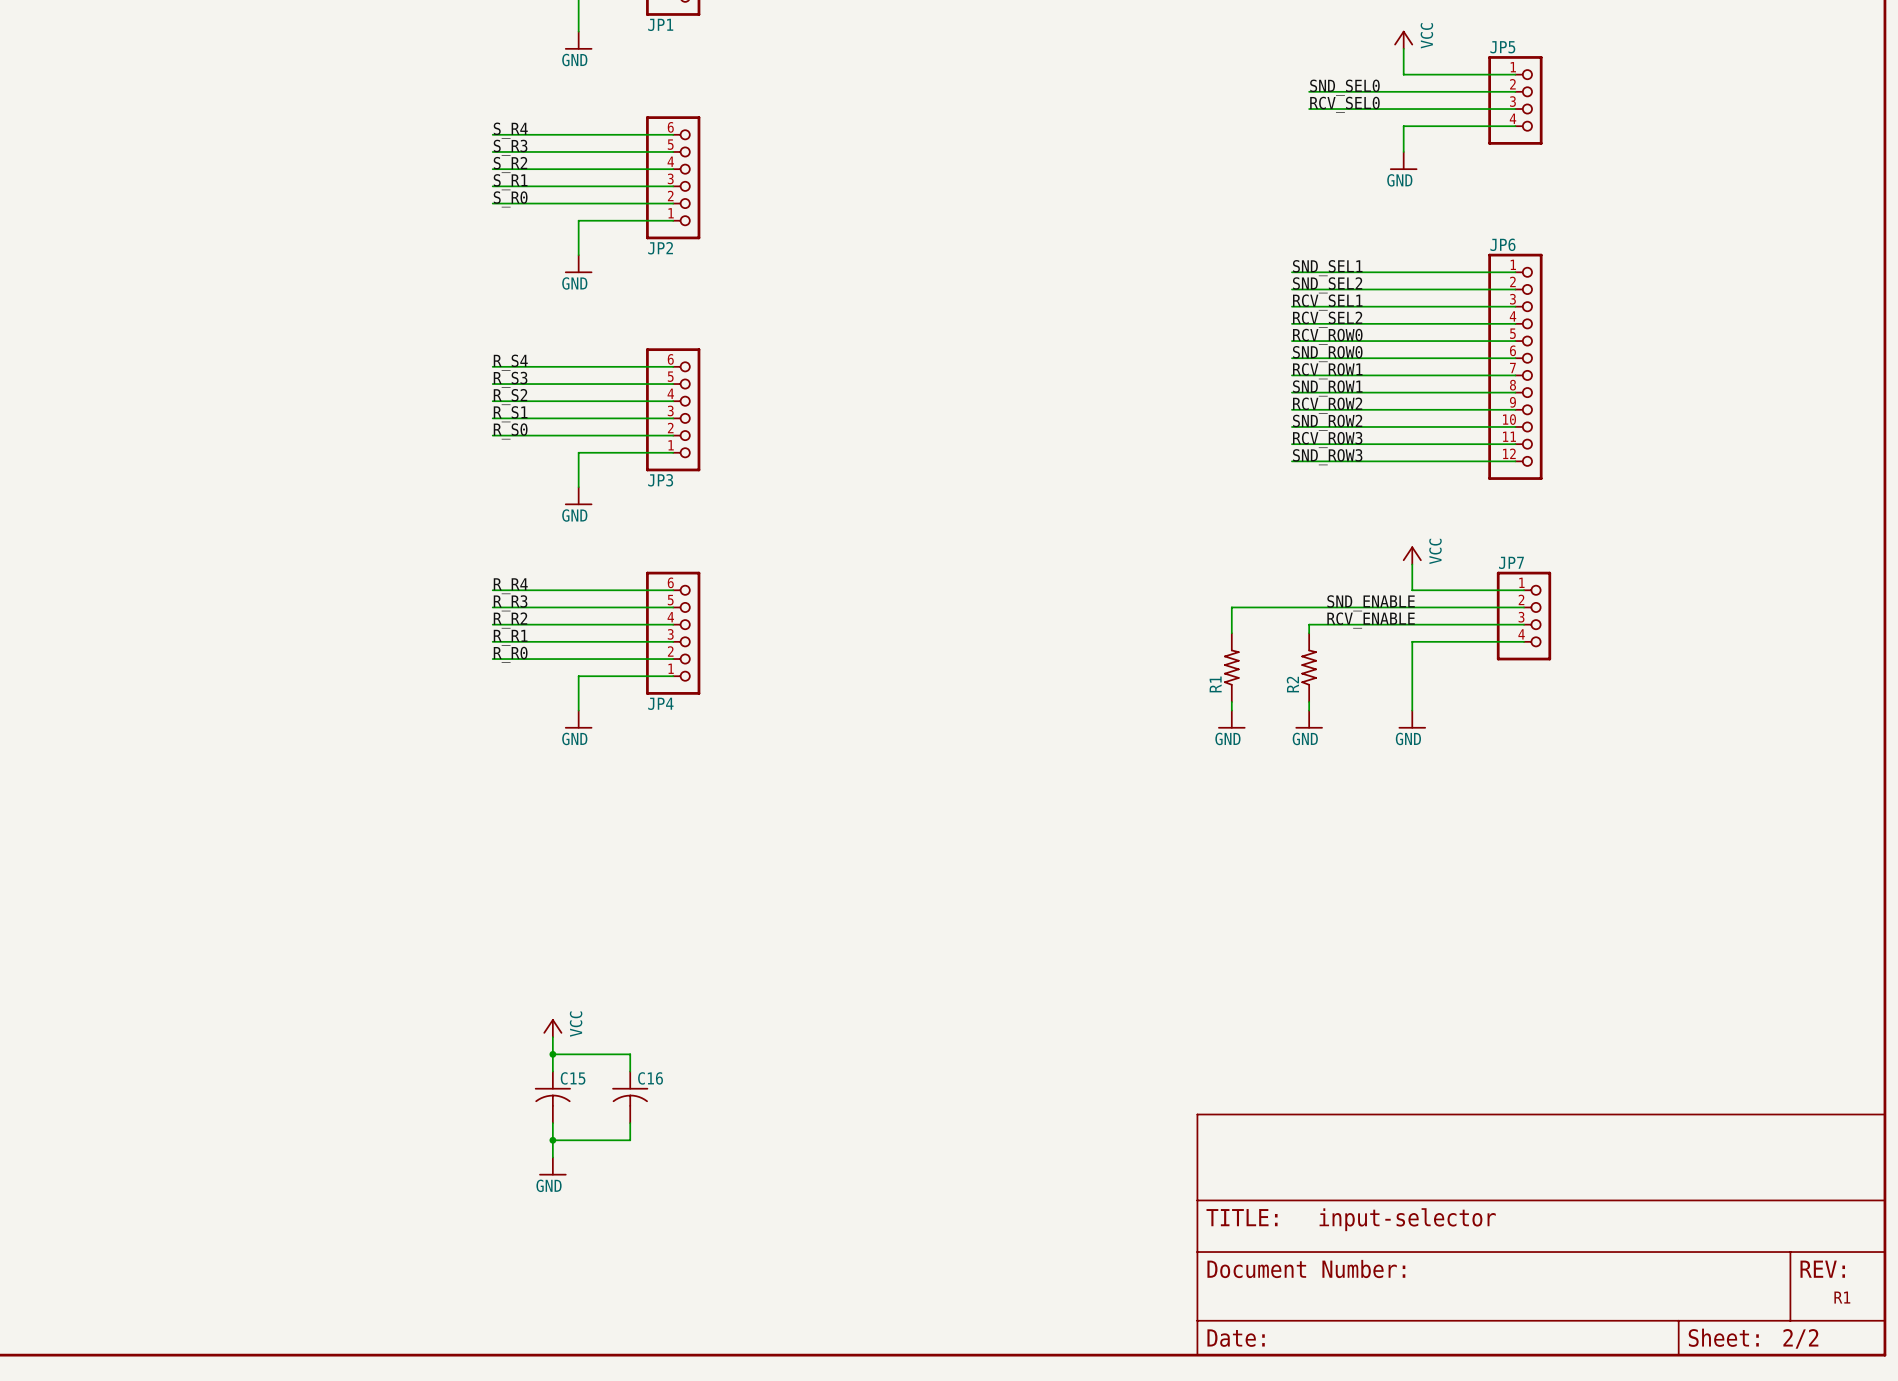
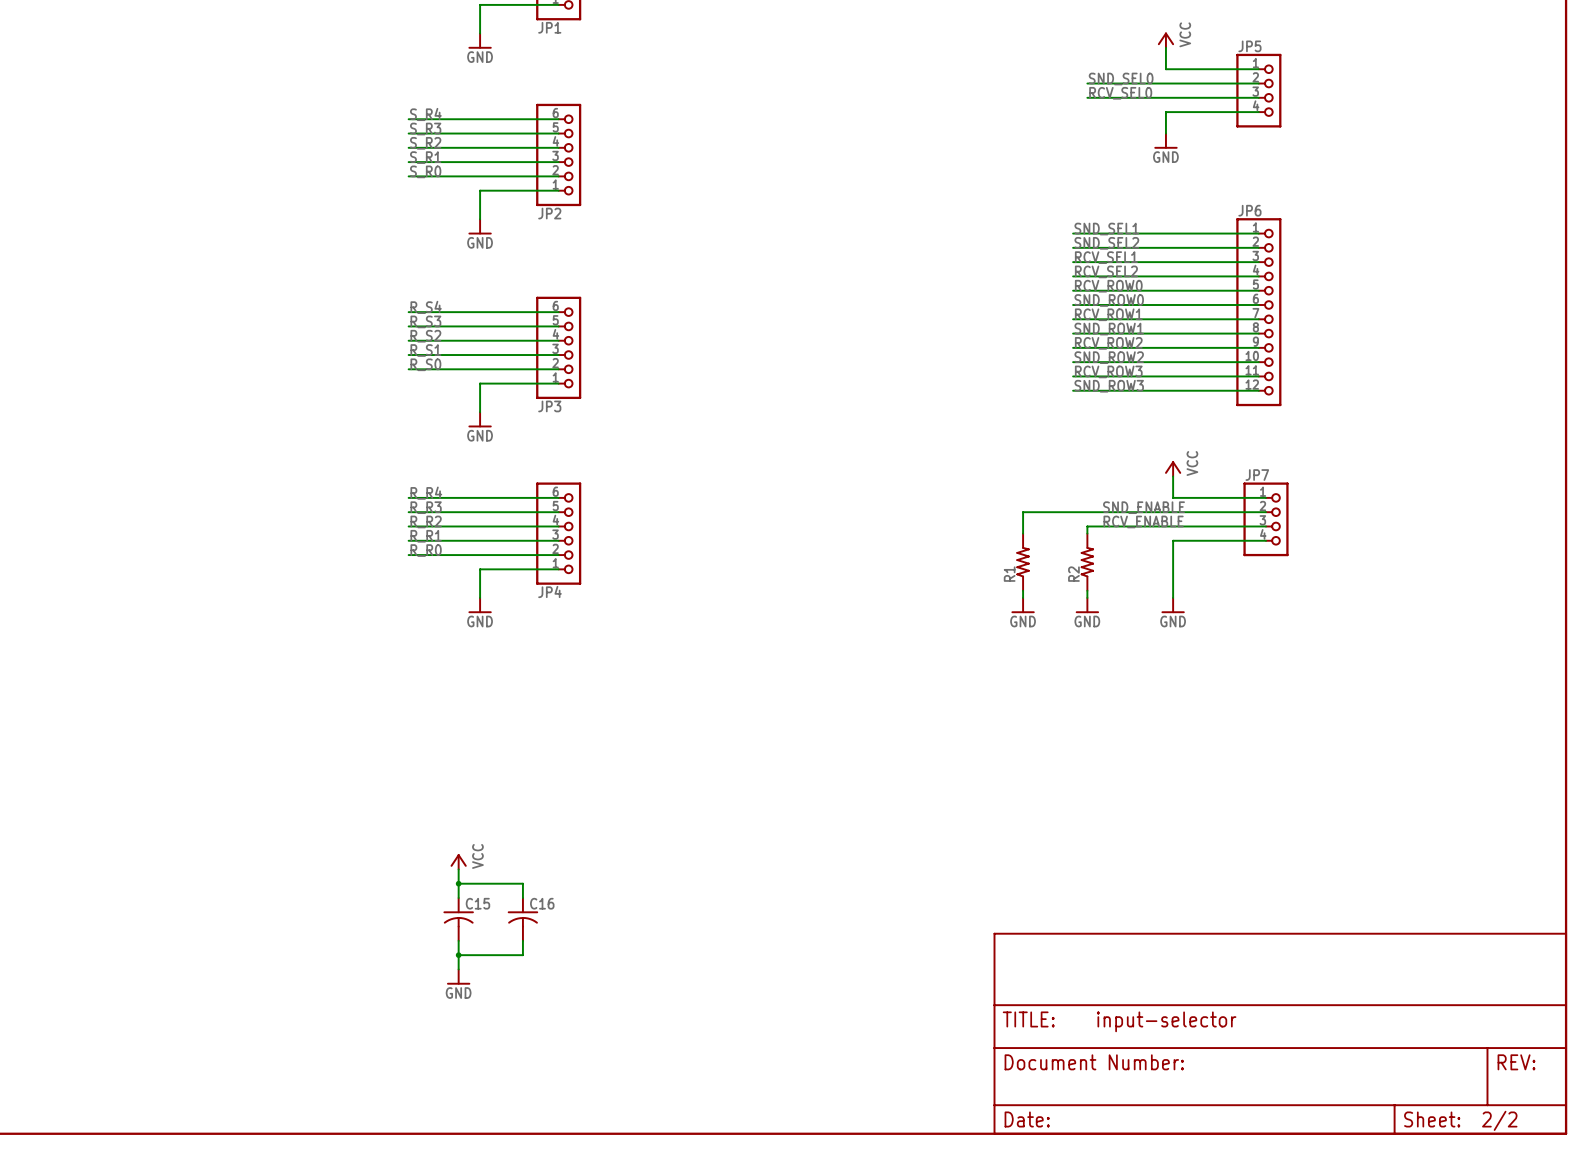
text: R1 (1842, 1297) -> none

